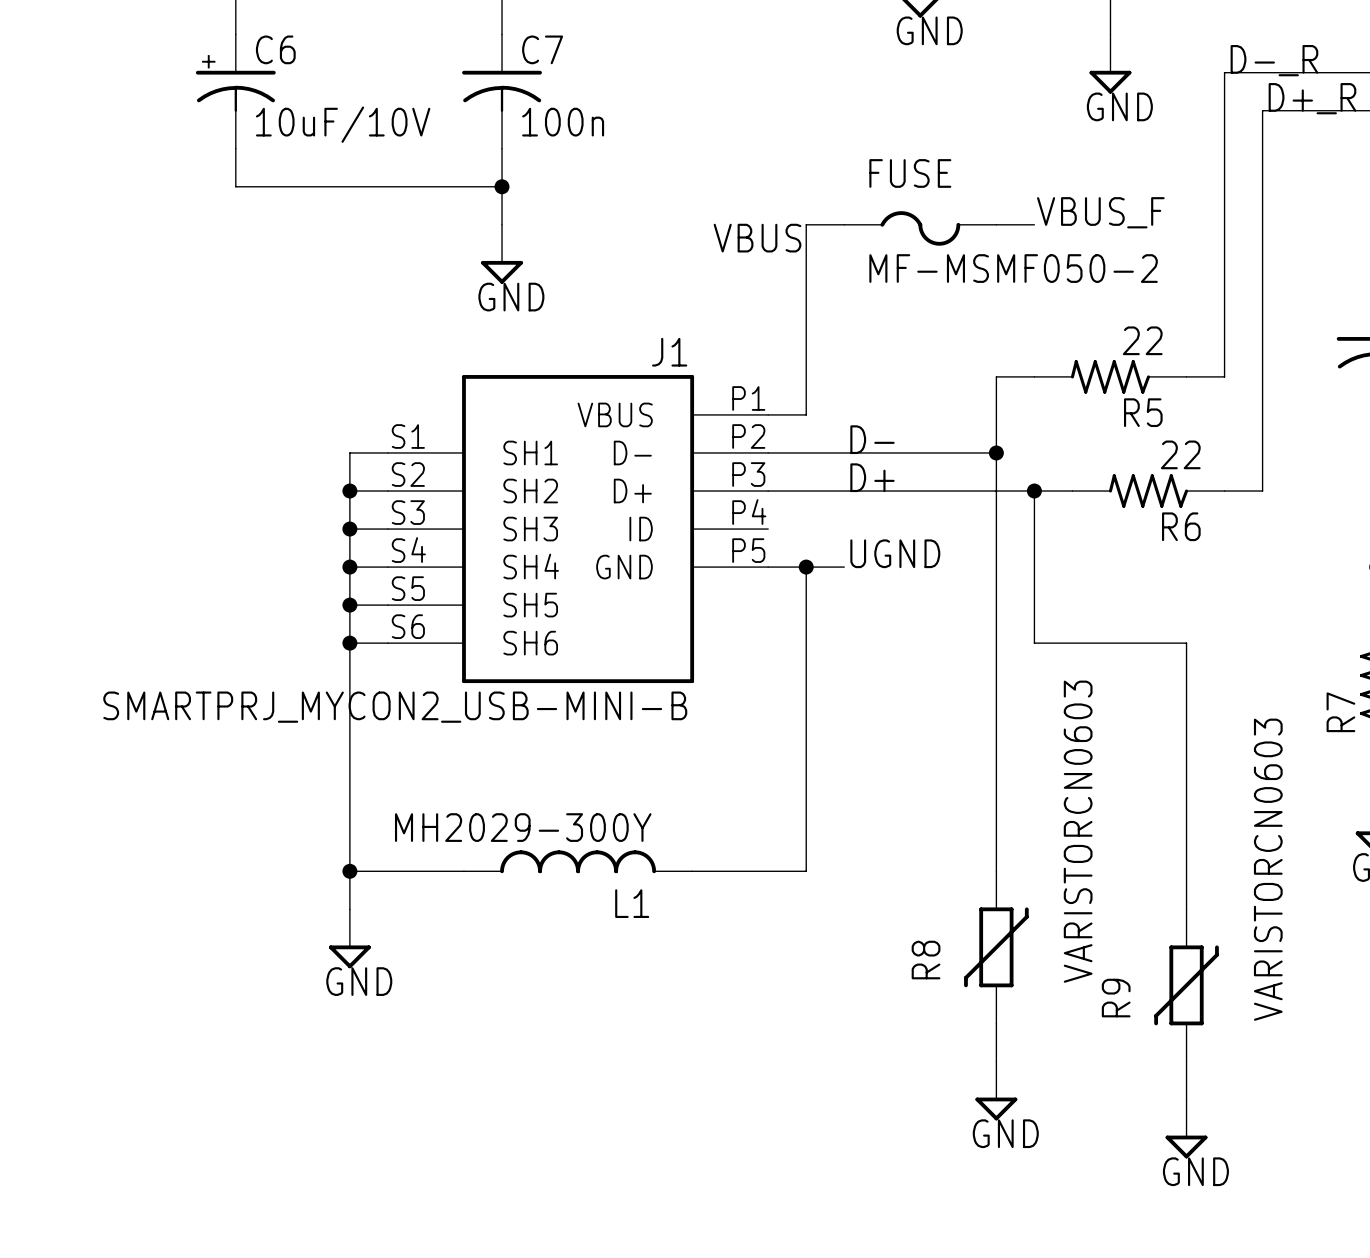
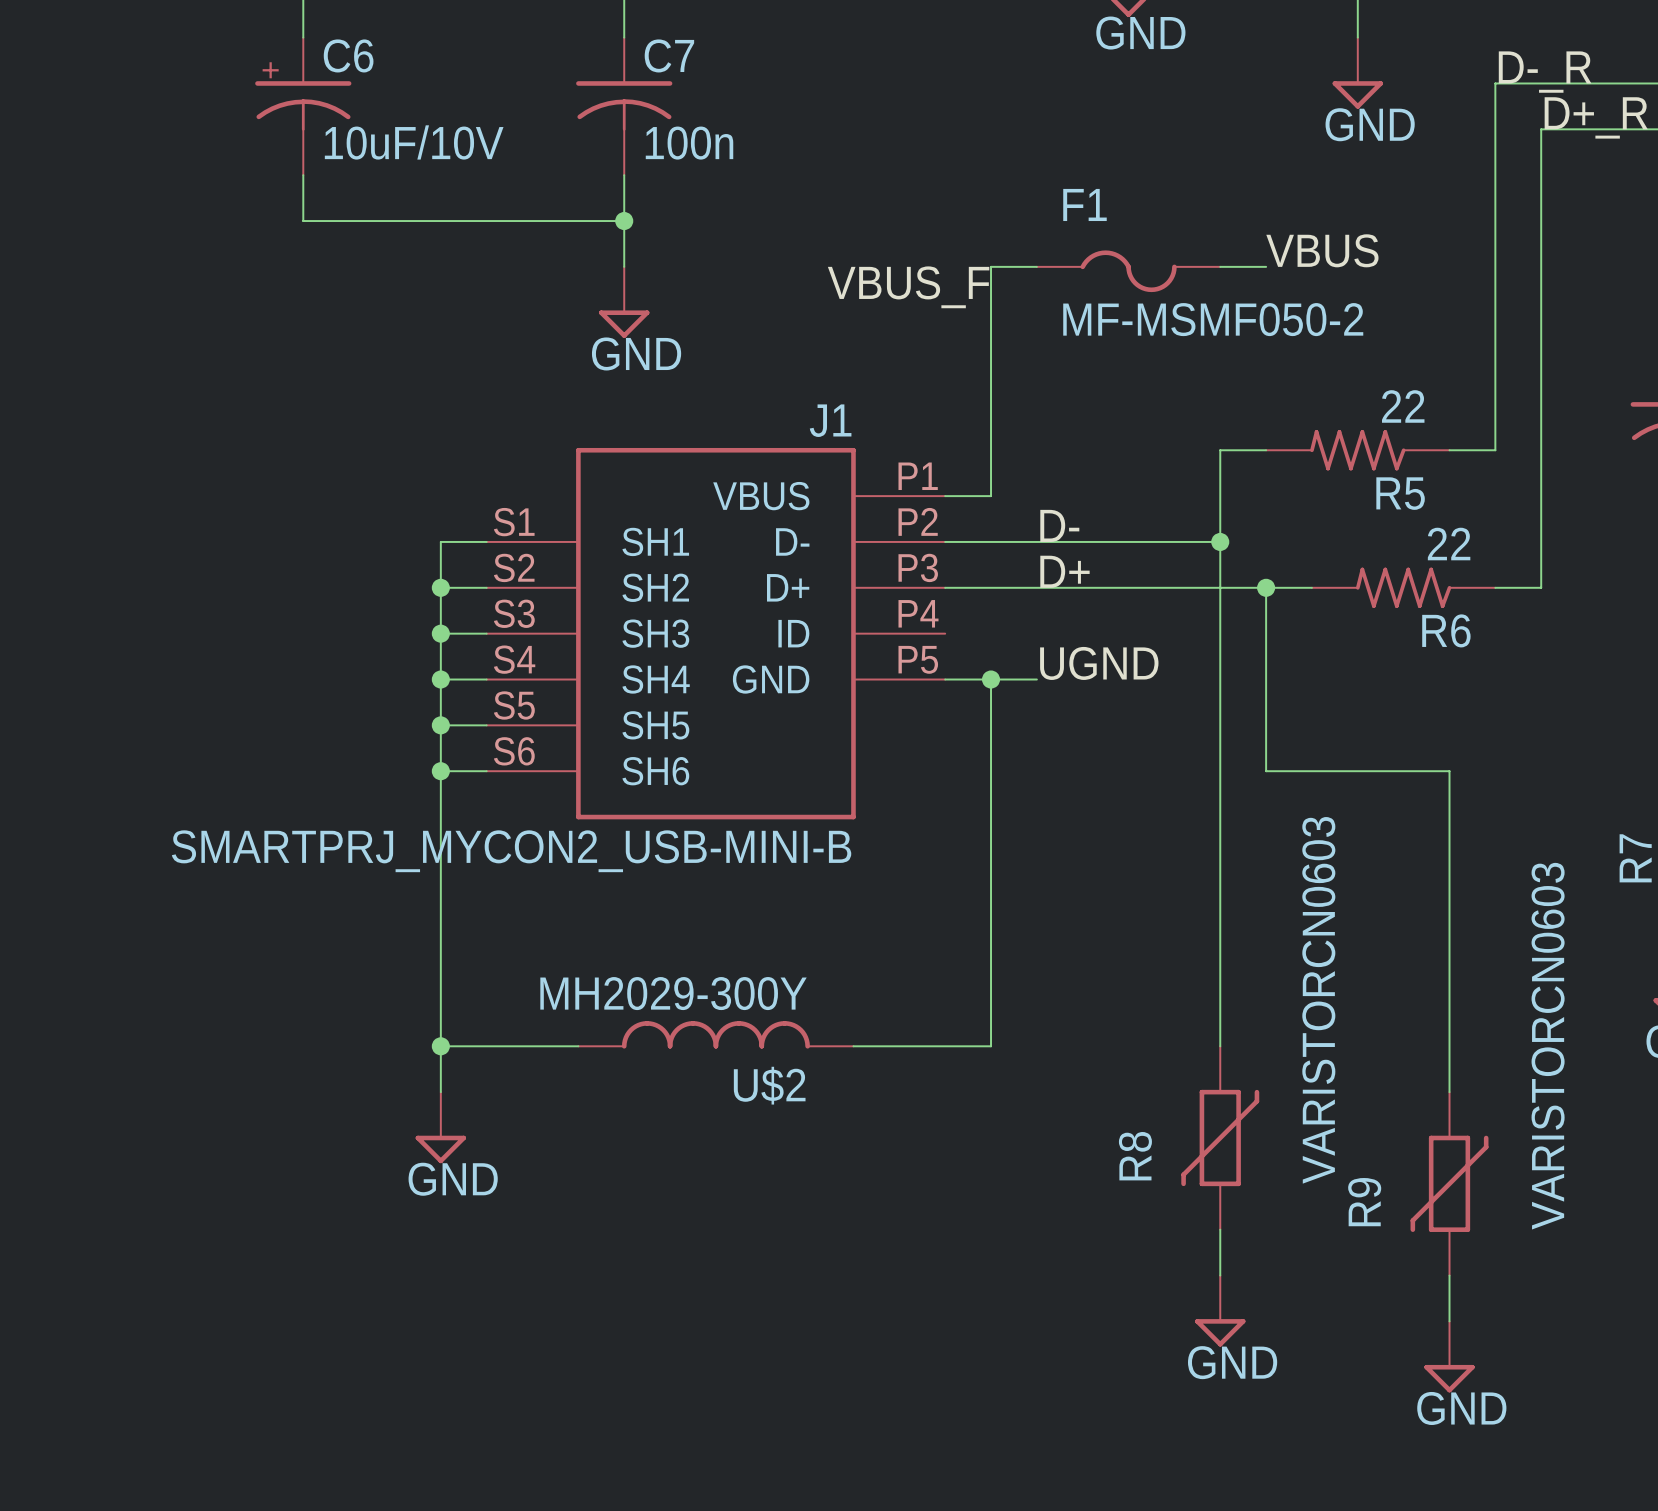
FUSE name: FUSE (910, 173) -> F1 (1084, 204)
label: VBUS_F (1100, 212) -> VBUS (1322, 250)
label: VBUS (757, 238) -> VBUS_F (908, 287)
L1 name: L1 (632, 903) -> U$2 (769, 1085)

